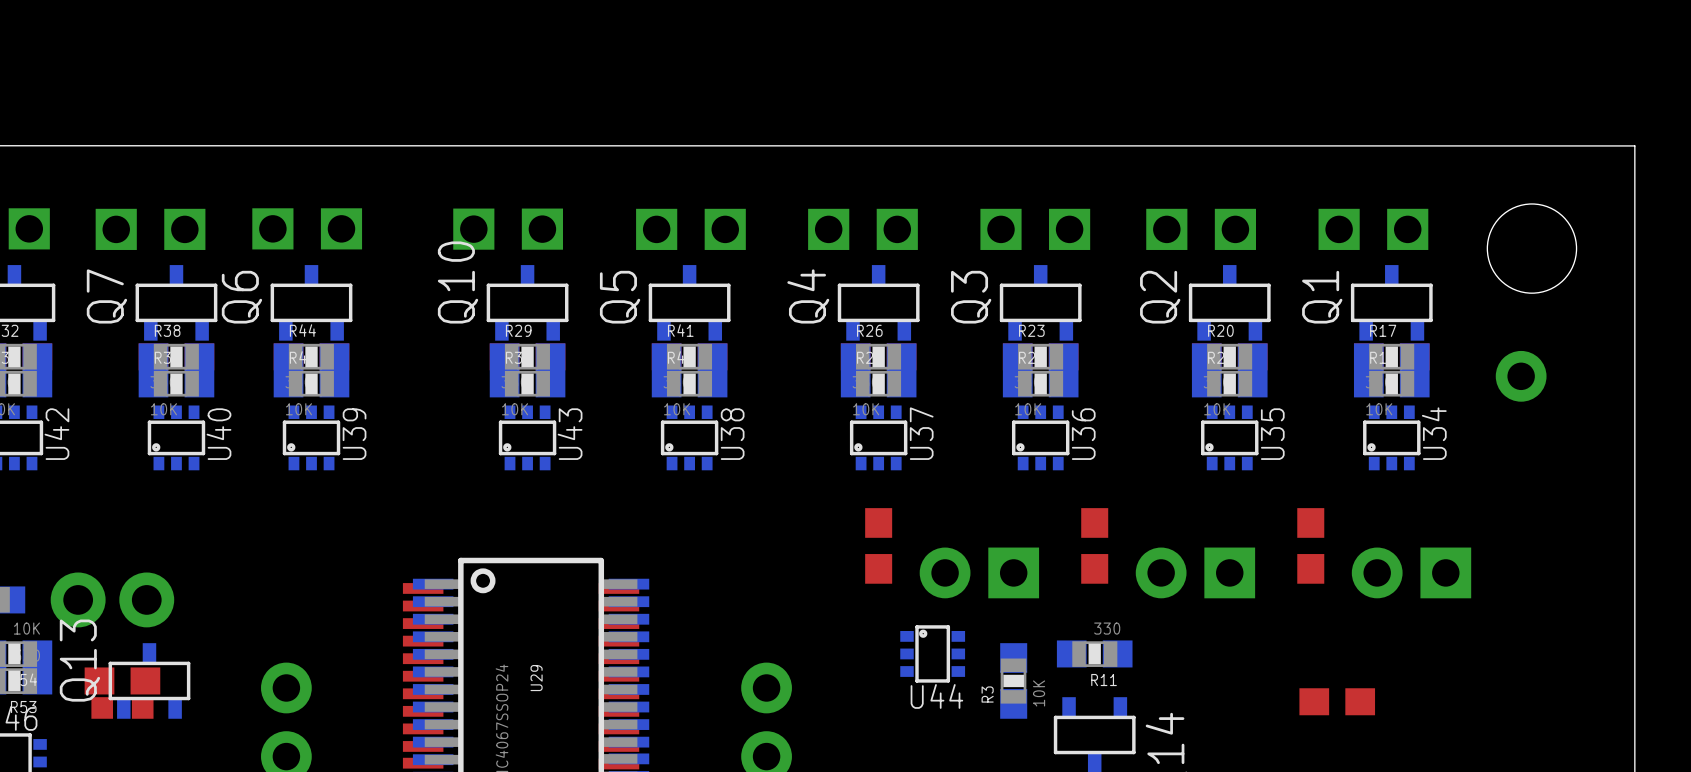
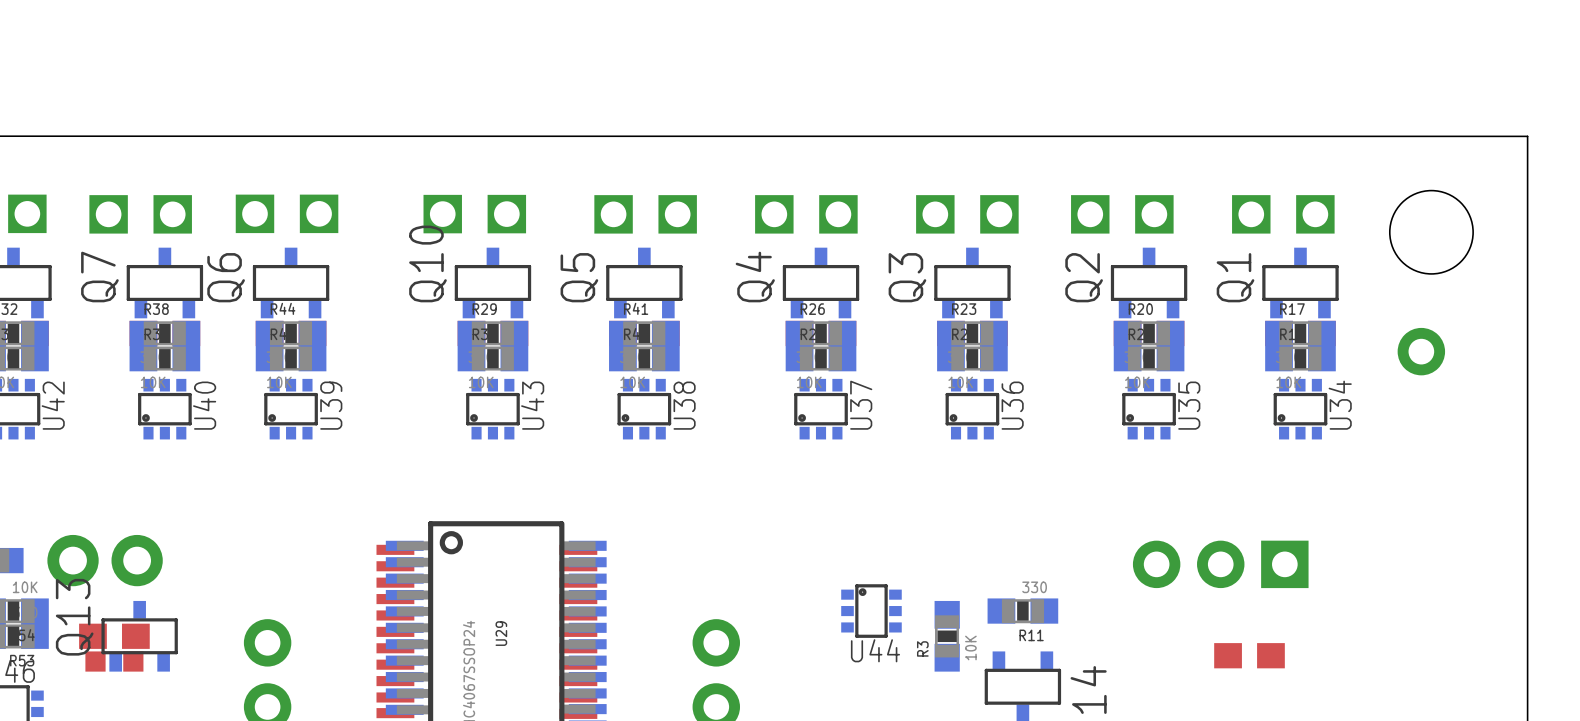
part: (878, 545) -> none
part: (1094, 545) -> none
part: (1310, 545) -> none
part: (979, 572) -> none
part: (1195, 572) -> none
part: (1411, 572) -> none
part: none -> (1220, 564)

